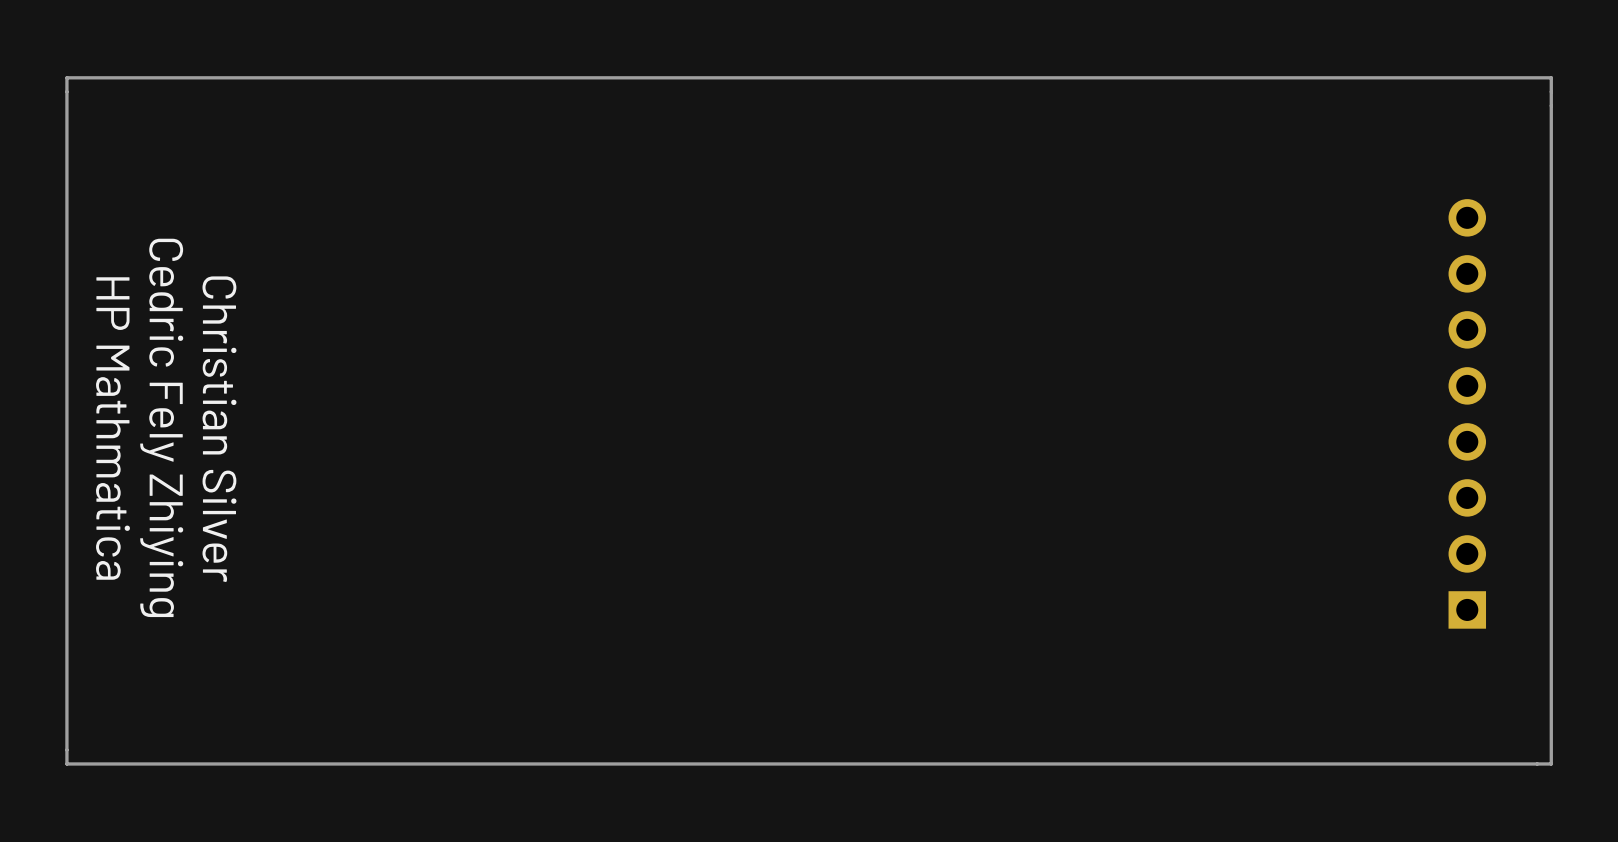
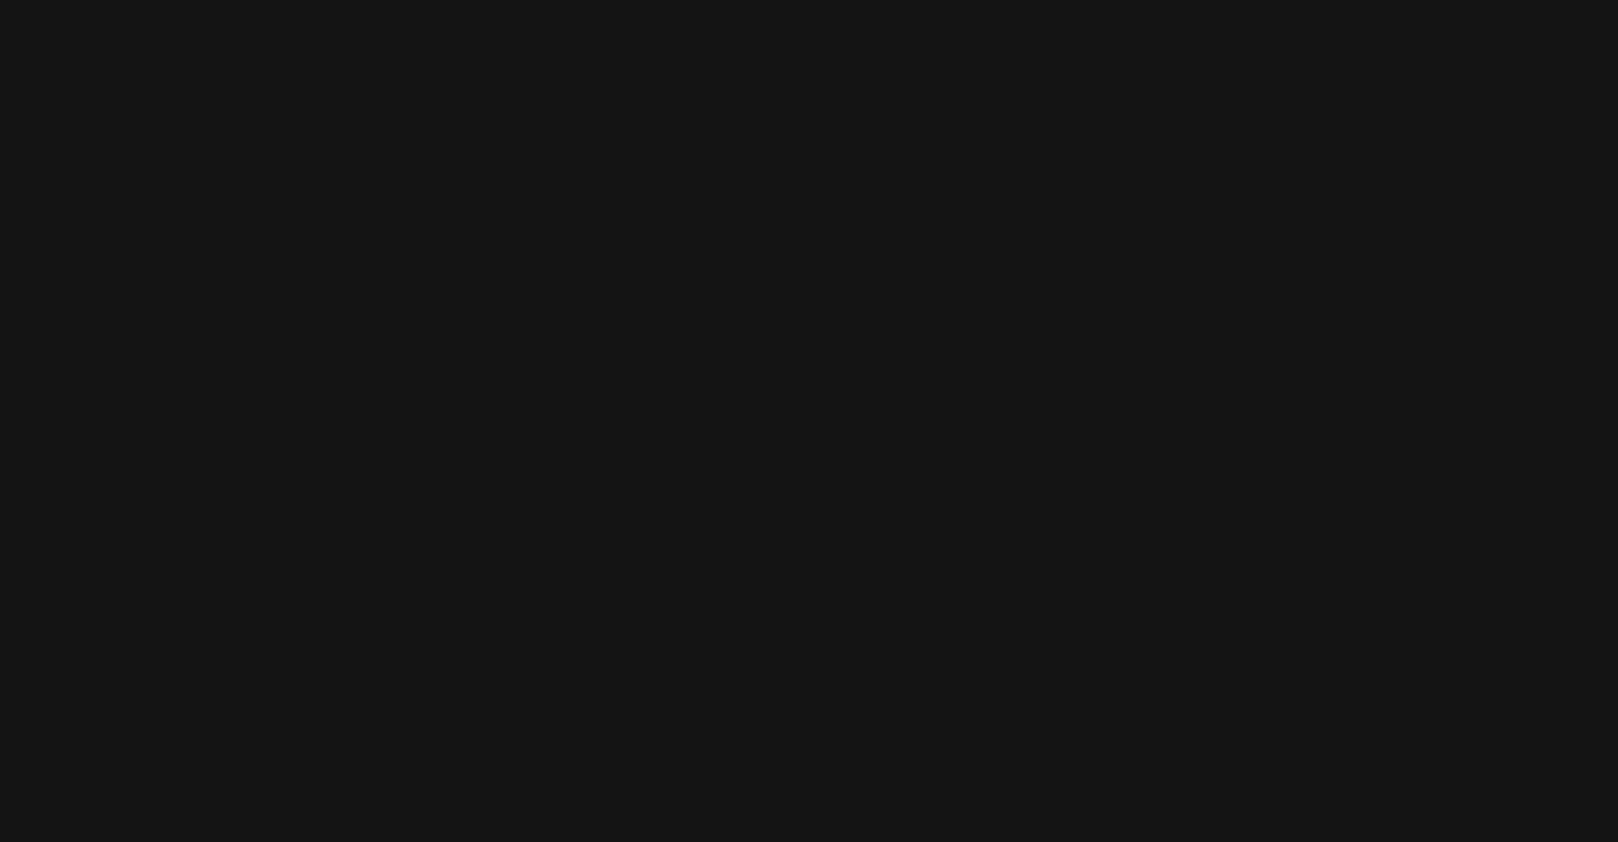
board edge: (1551, 77) (1551, 763) (66, 763) (66, 77) (1551, 77) -> none
part: (1467, 413) -> none
text: Cedric Fely Zhiying (161, 427) -> none
text: HP Mathmatica (112, 428) -> none
text: Christian Silver (219, 429) -> none

